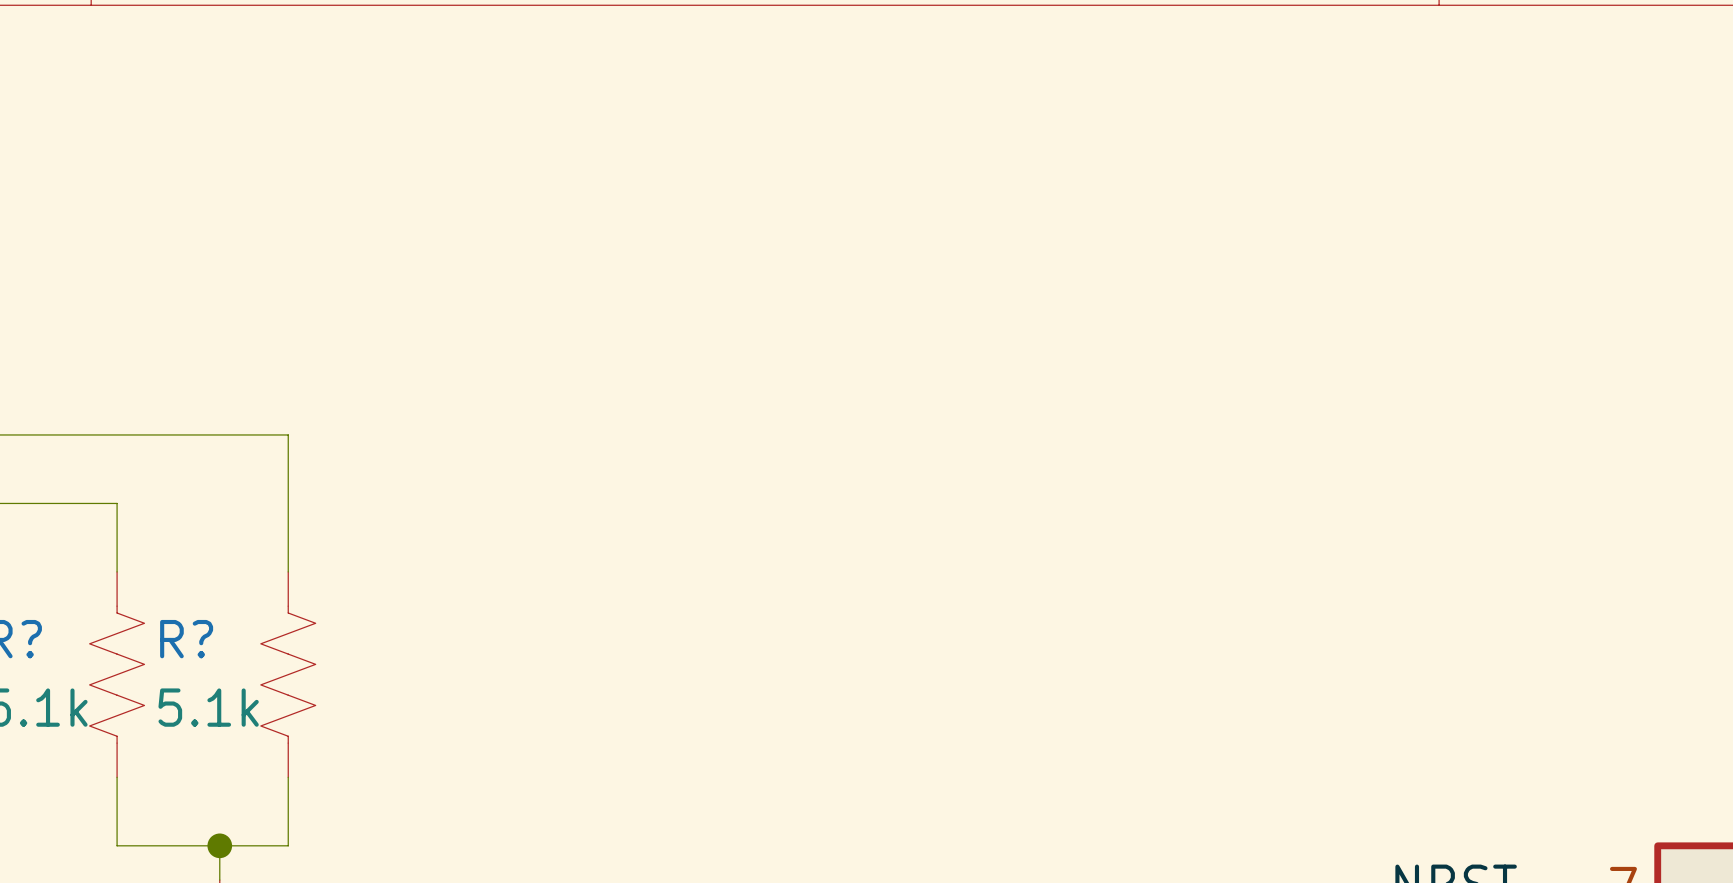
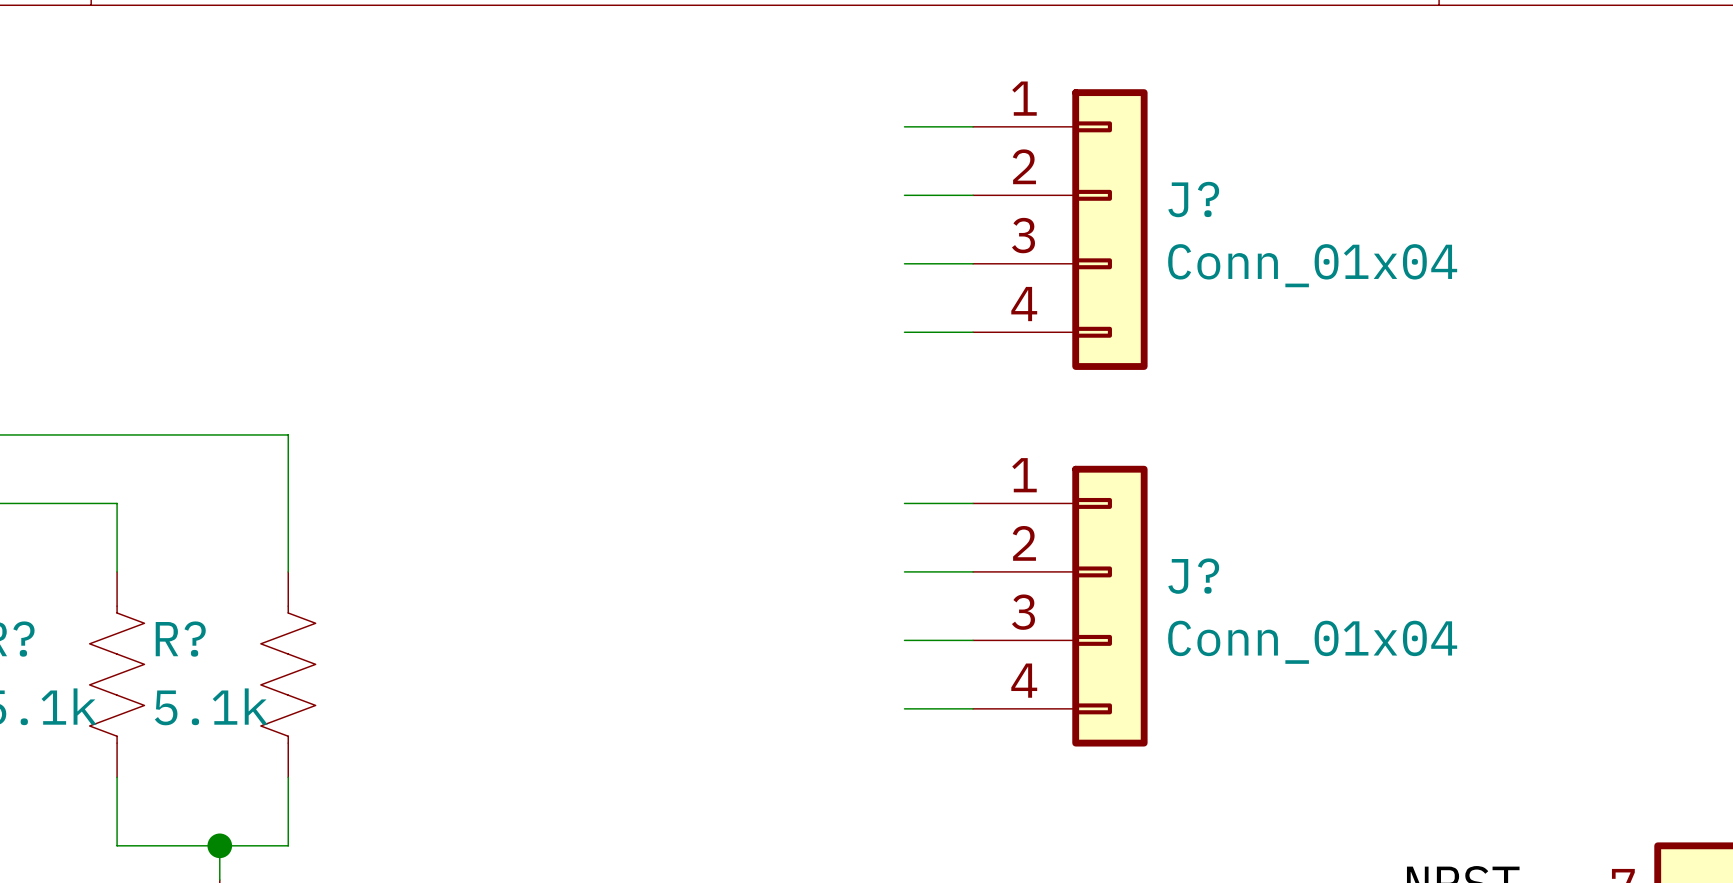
wire: none -> (904, 126) (972, 126)
wire: none -> (904, 195) (972, 195)
J?: none -> Conn_01x04 (1060, 229)
wire: none -> (904, 263) (972, 263)
wire: none -> (904, 332) (972, 332)
wire: none -> (904, 503) (972, 503)
wire: none -> (904, 571) (972, 571)
J?: none -> Conn_01x04 (1060, 606)
wire: none -> (904, 640) (972, 640)
wire: none -> (904, 708) (972, 708)

